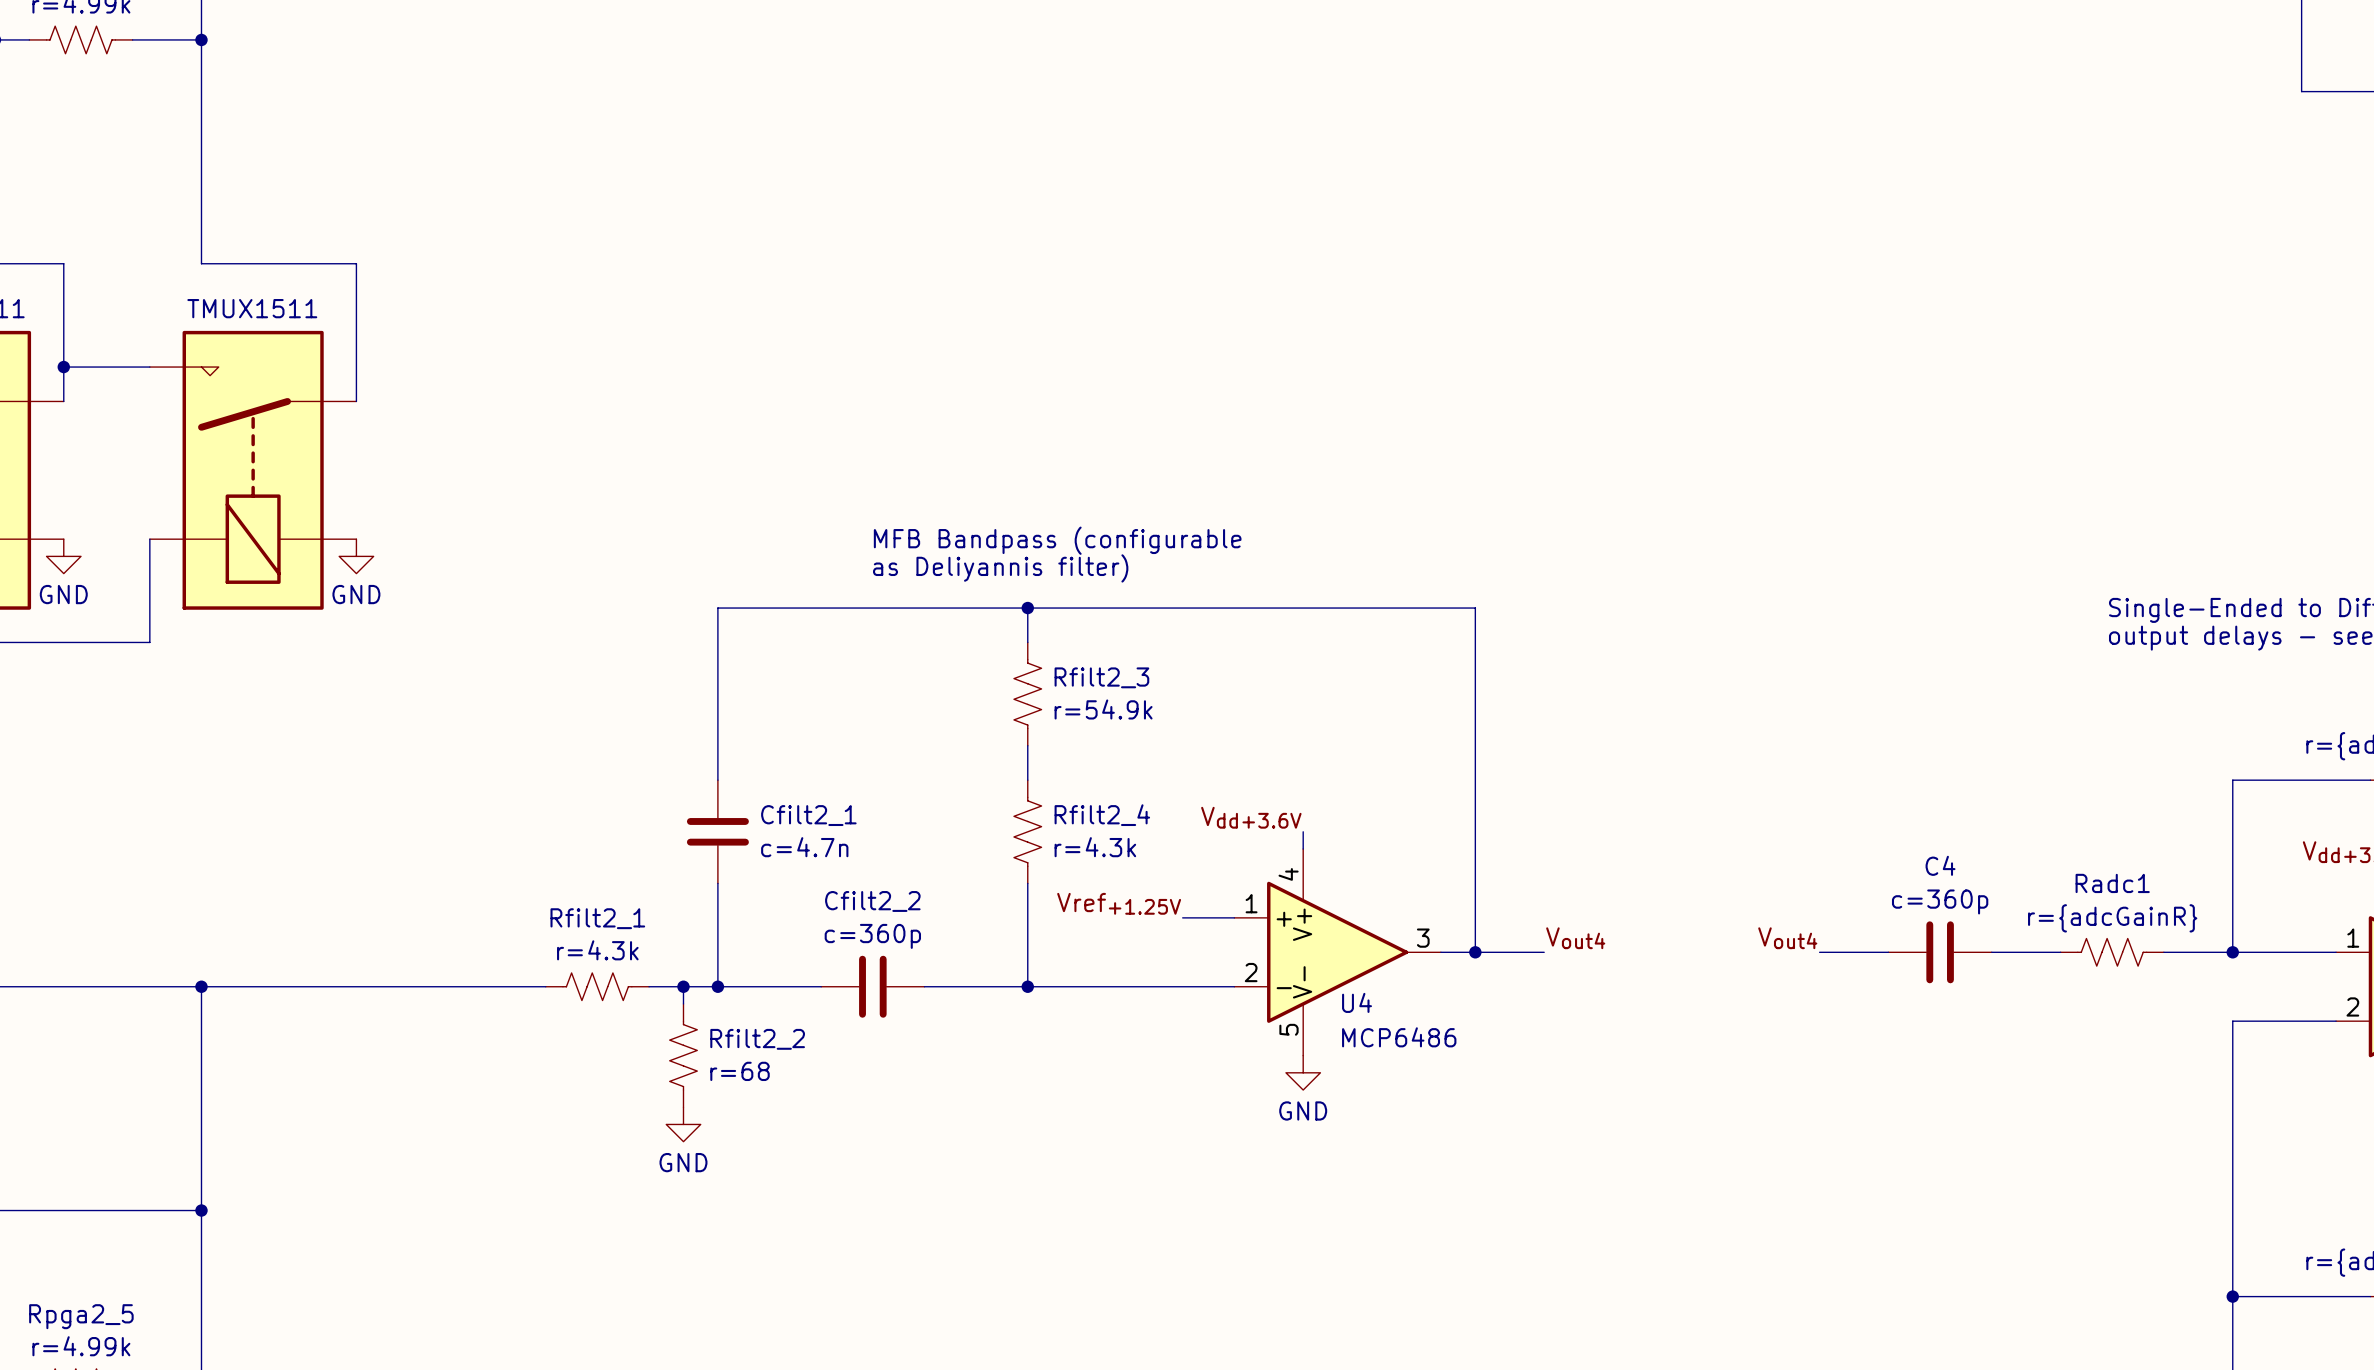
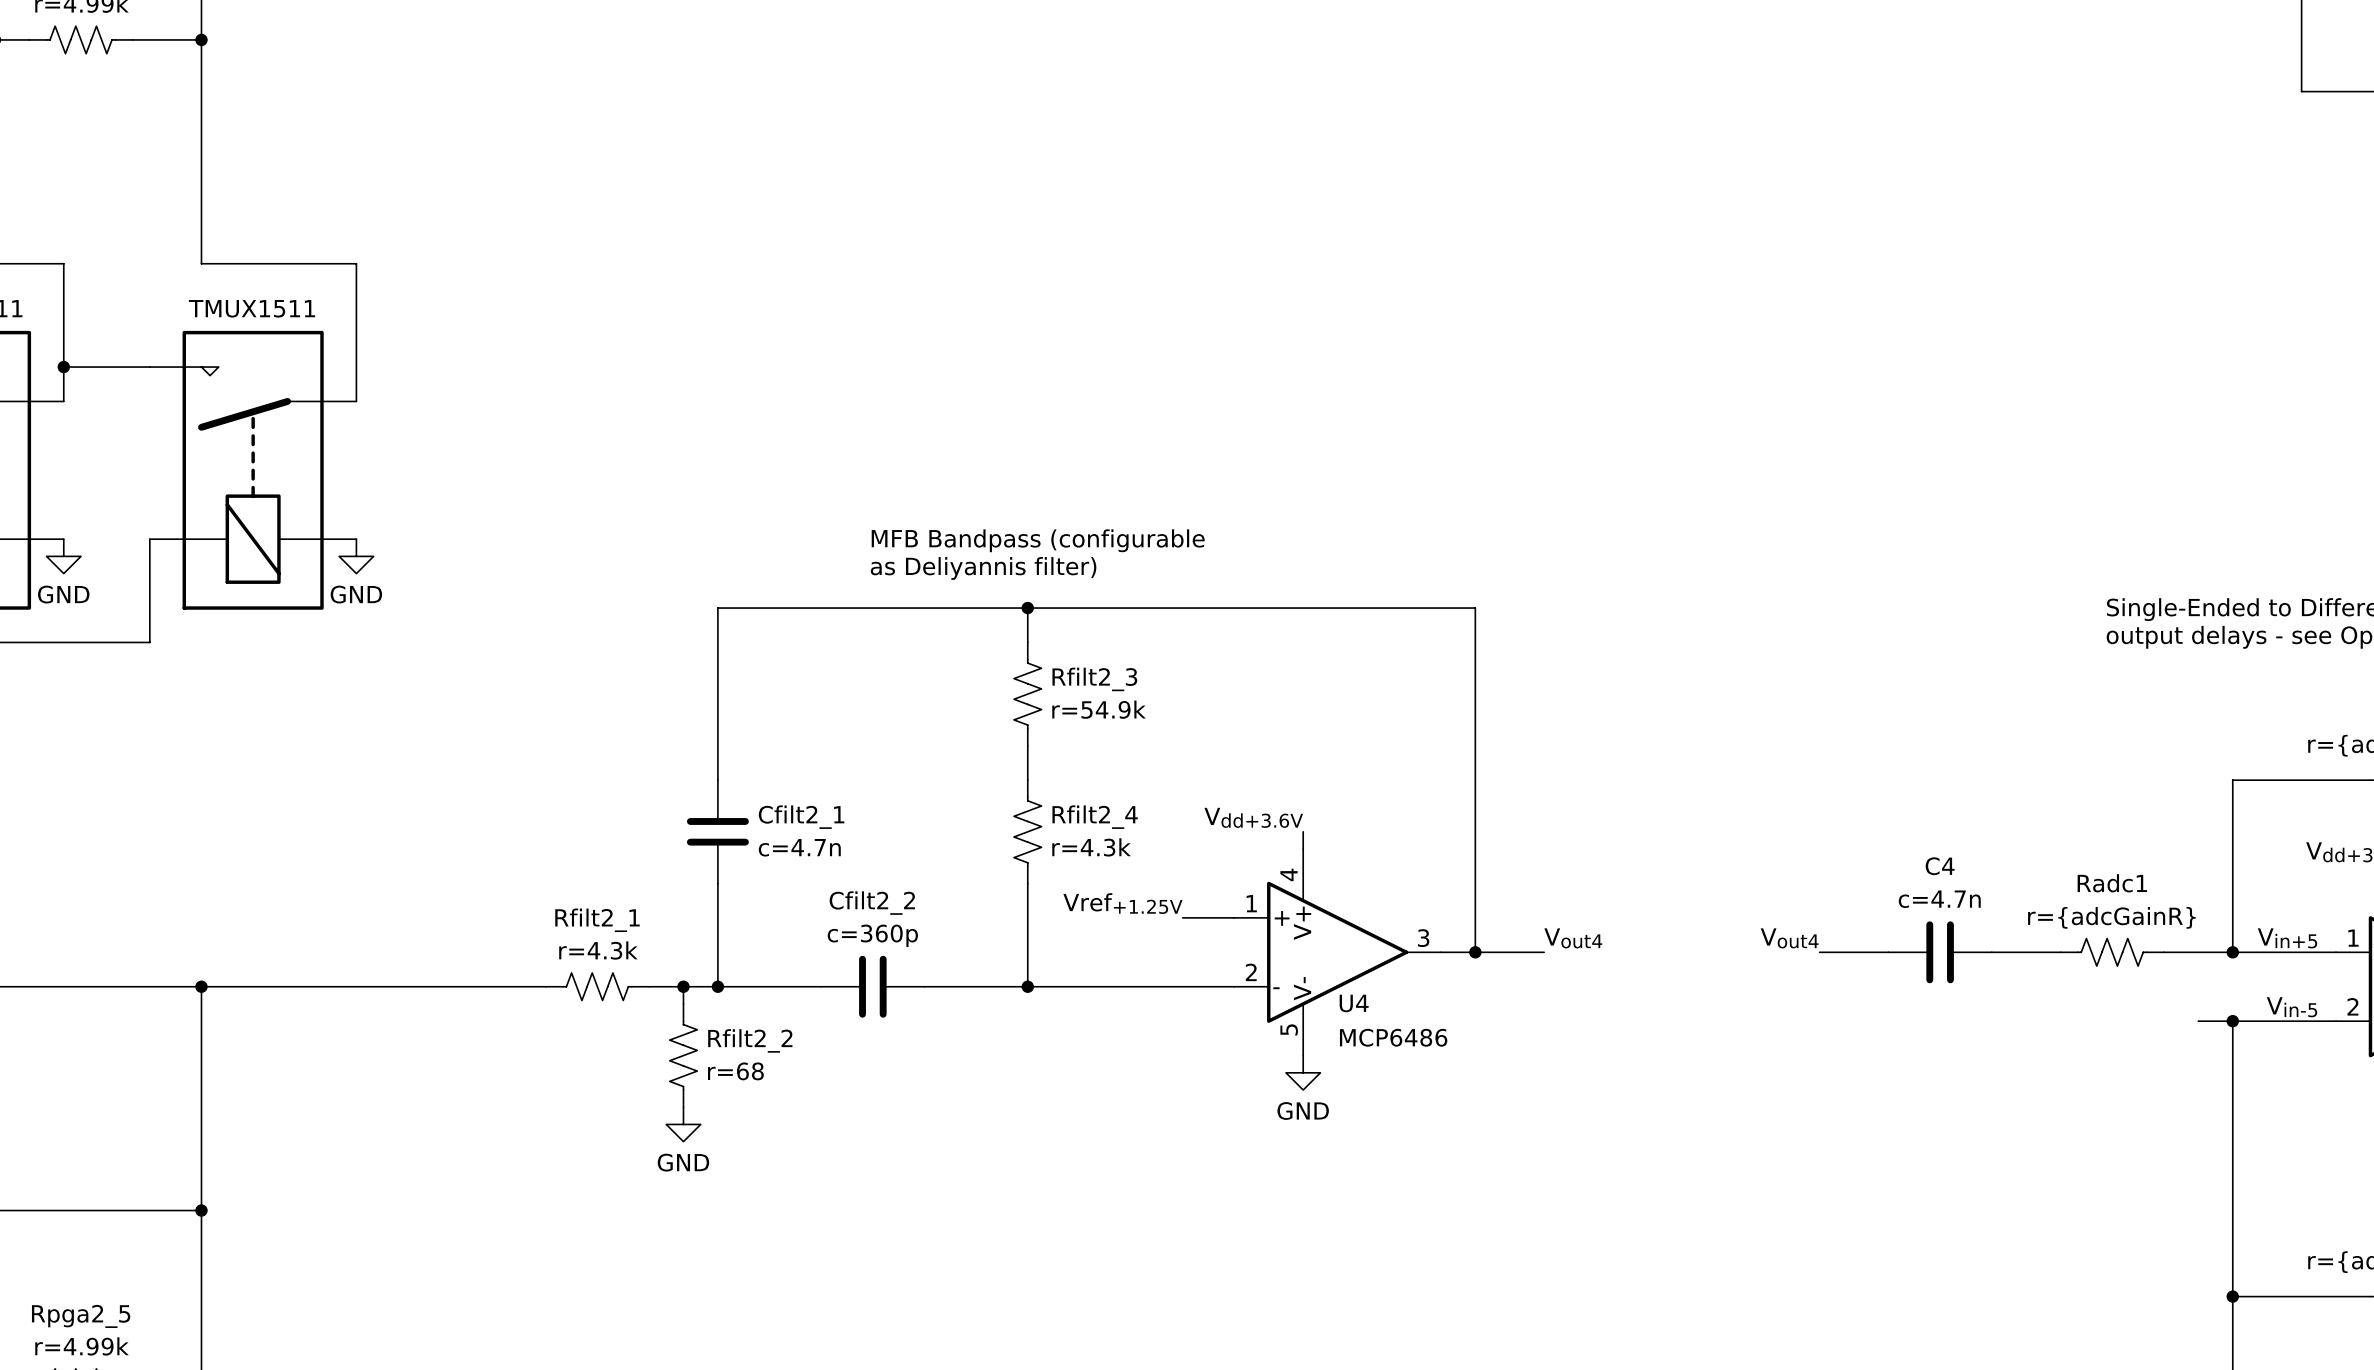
C4 value: c=360p (1940, 901) -> c=4.7n (1939, 899)
label: none -> Vin+5 (2287, 938)
label: none -> Vin-5 (2292, 1007)
wire: none -> (2198, 1021) (2232, 1021)
junction: none -> (2232, 1021)

